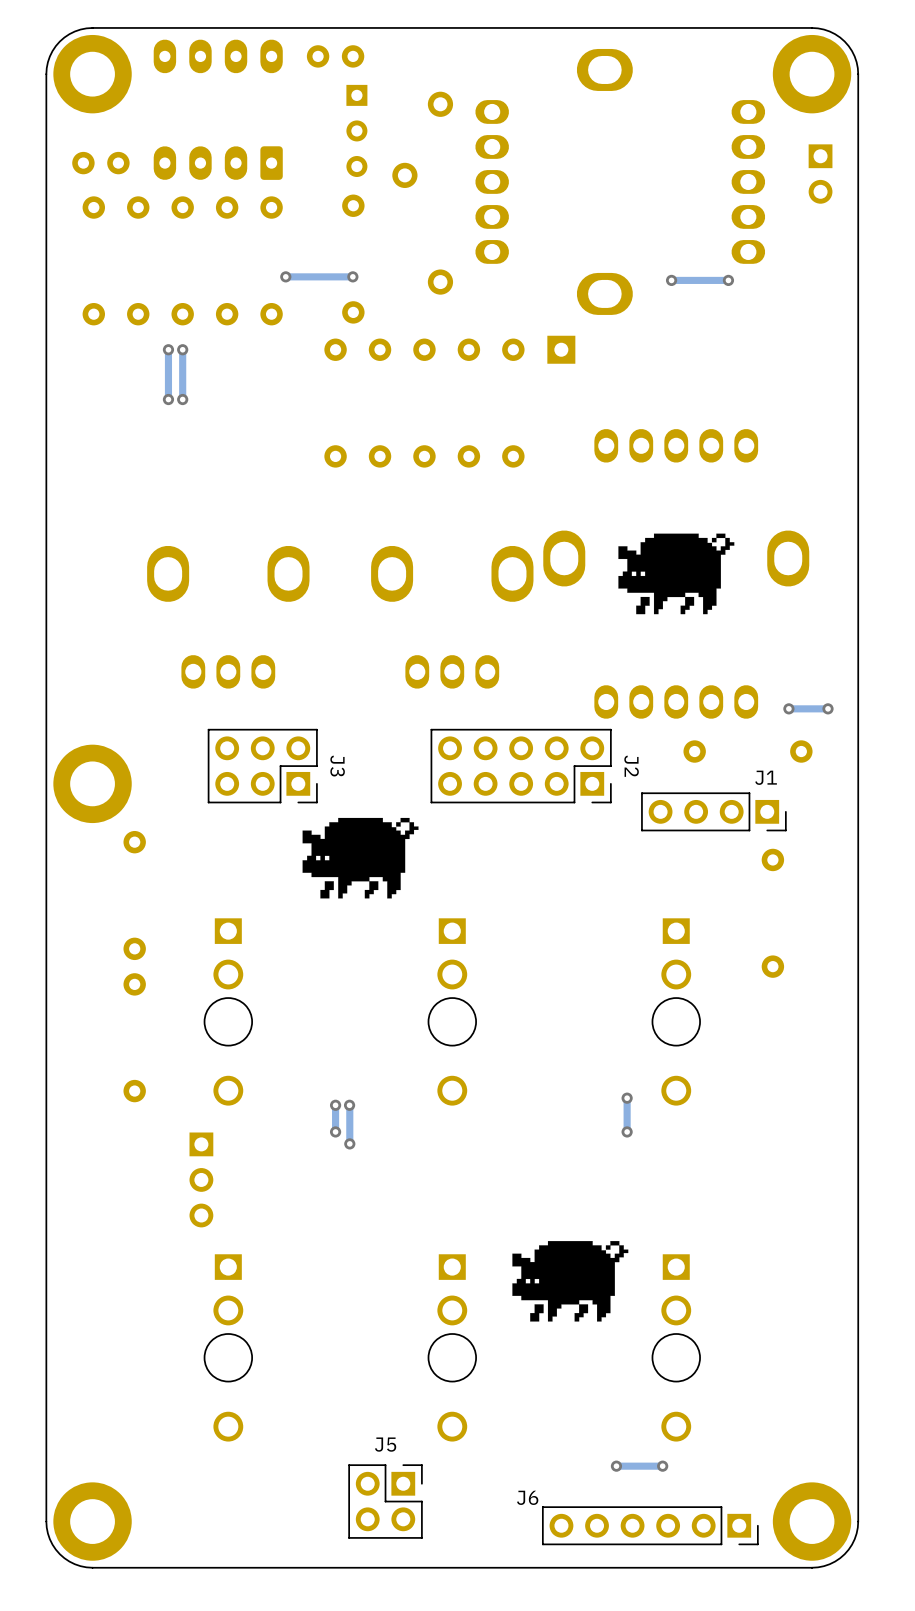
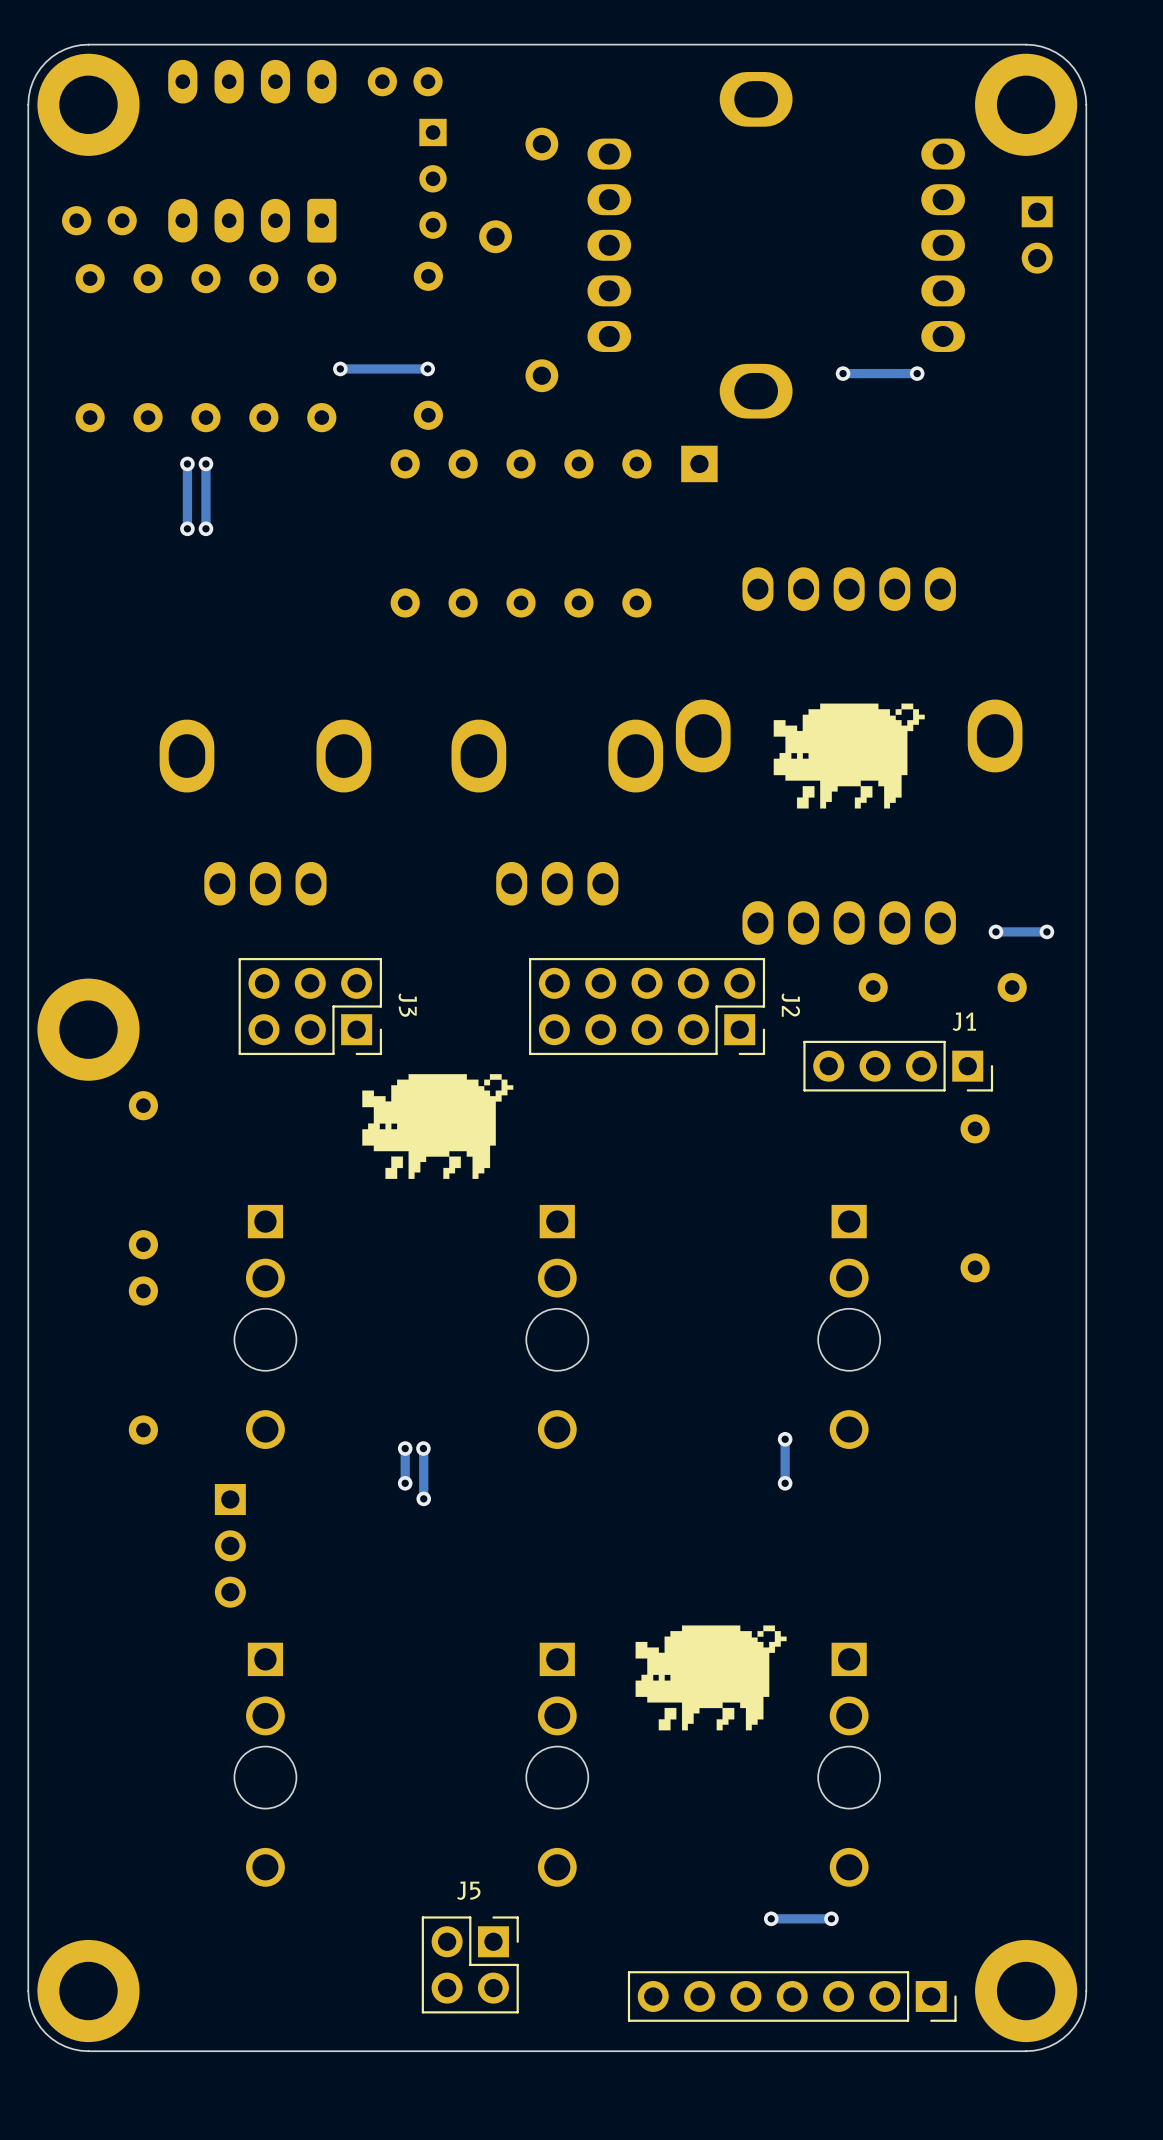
part: none -> (792, 1996)
J6: (650, 1525) -> none

